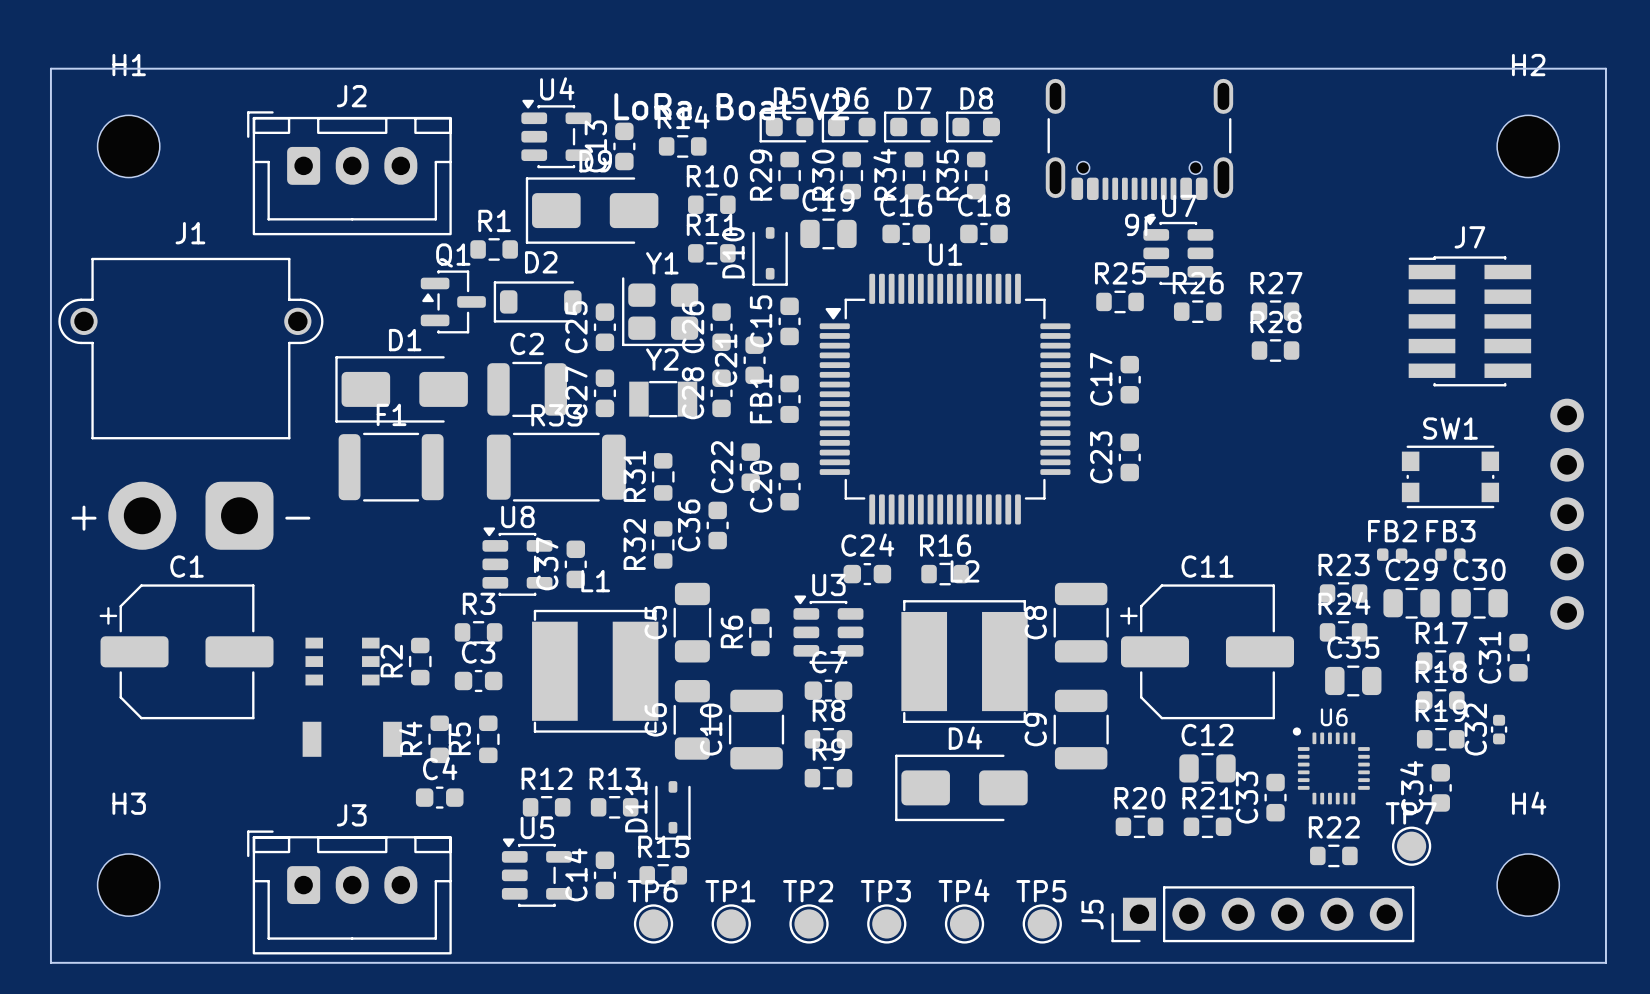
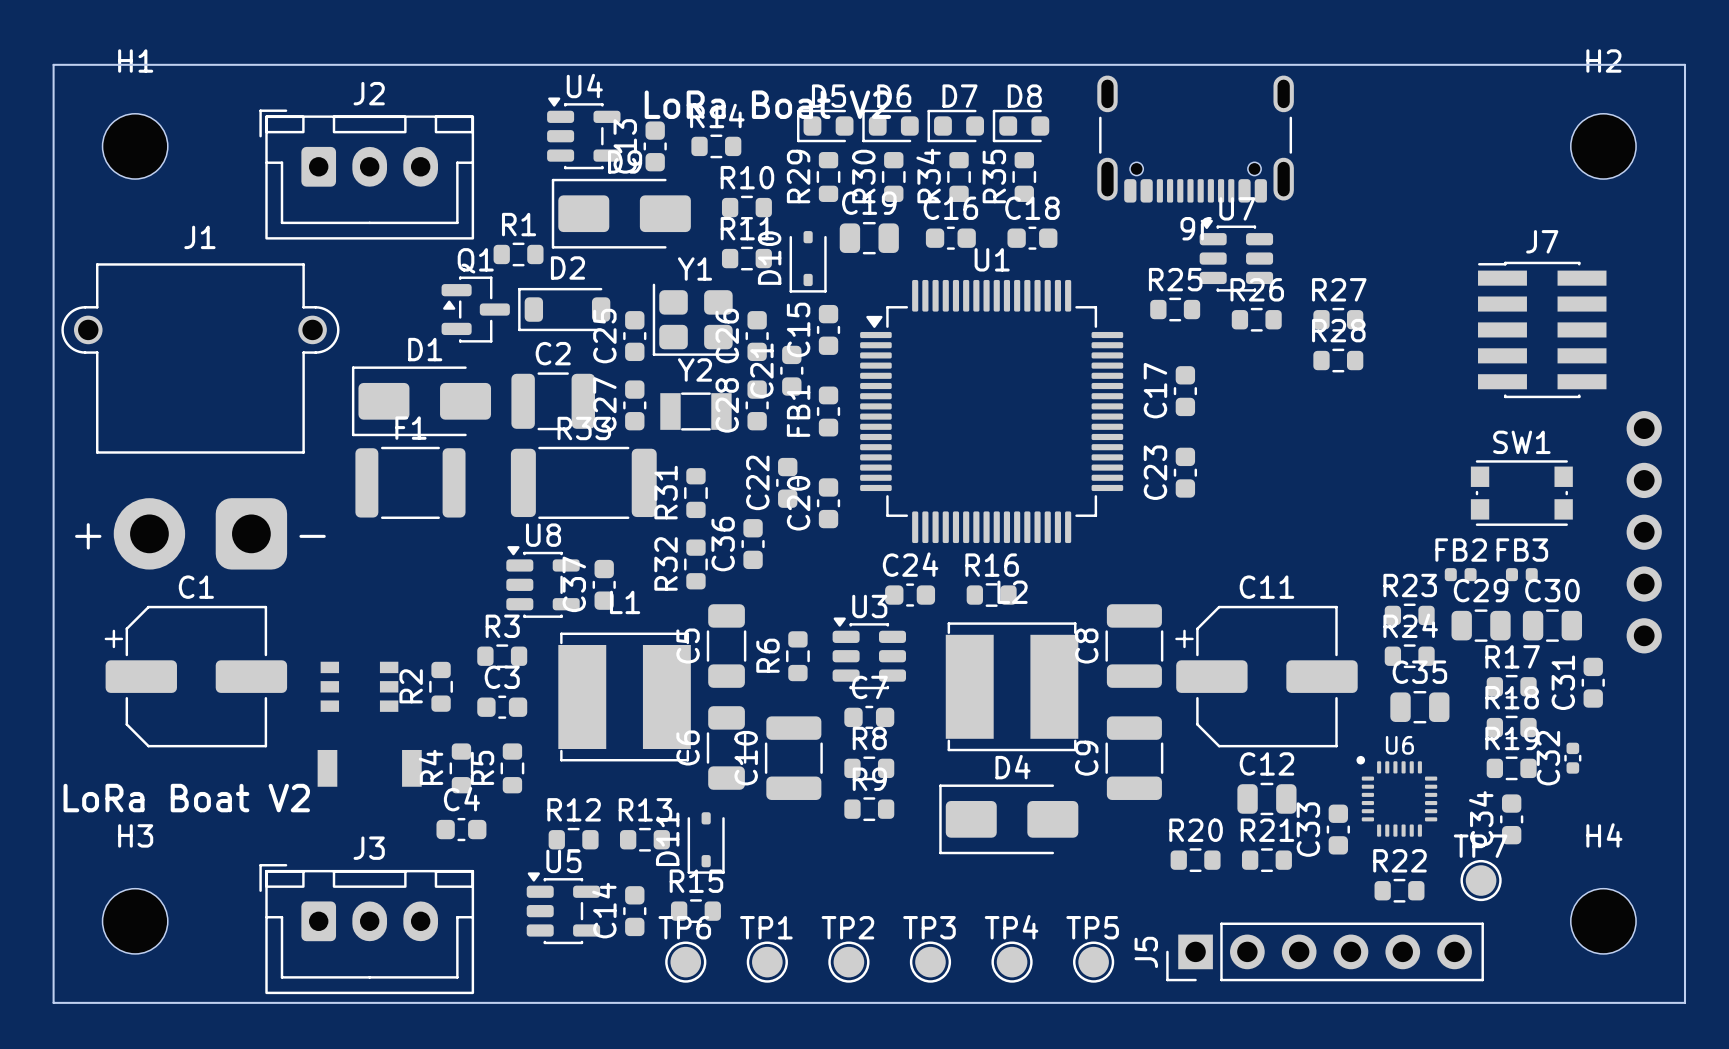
text: none -> LoRa Boat V2 (186, 798)

